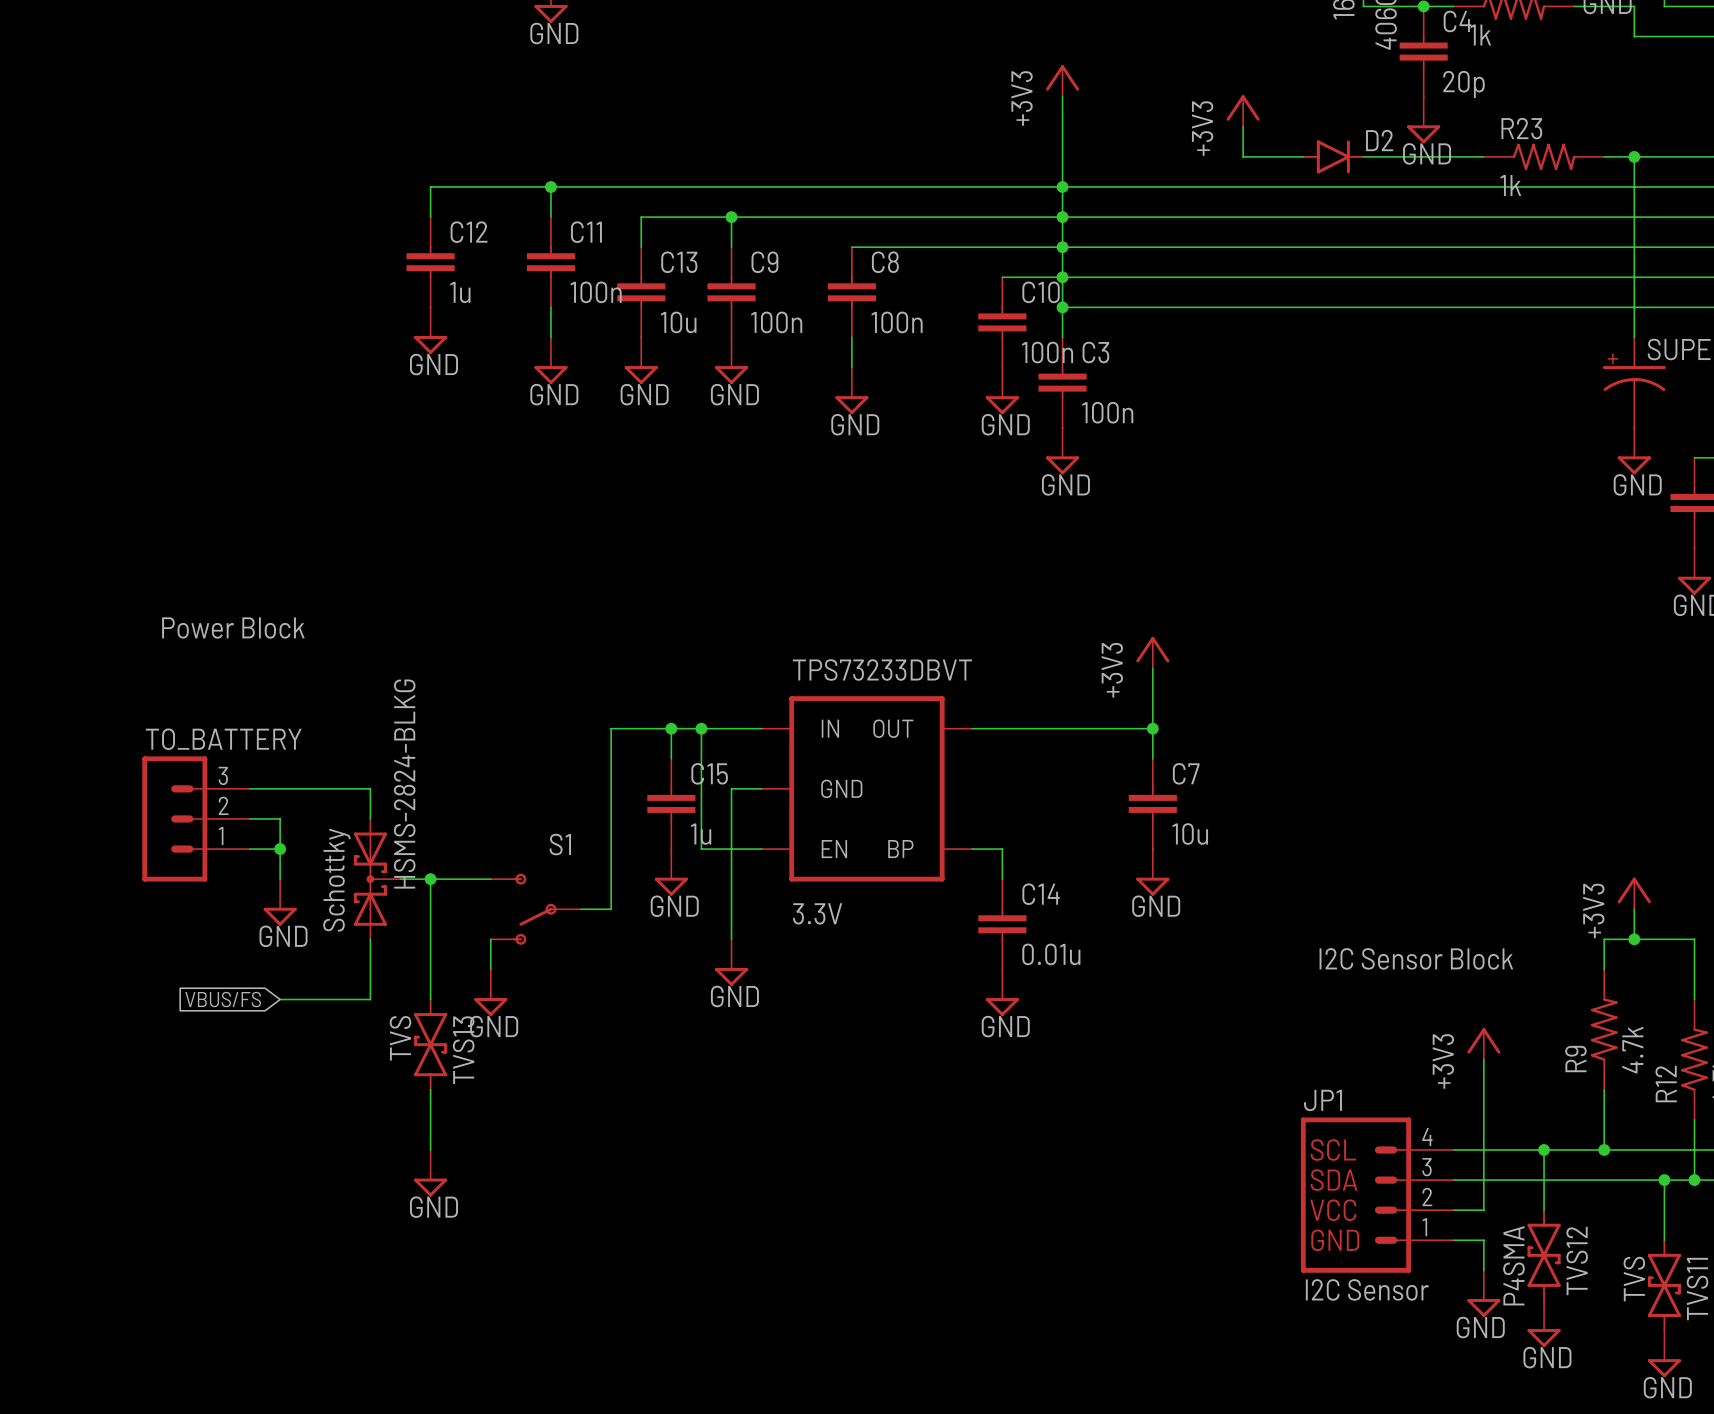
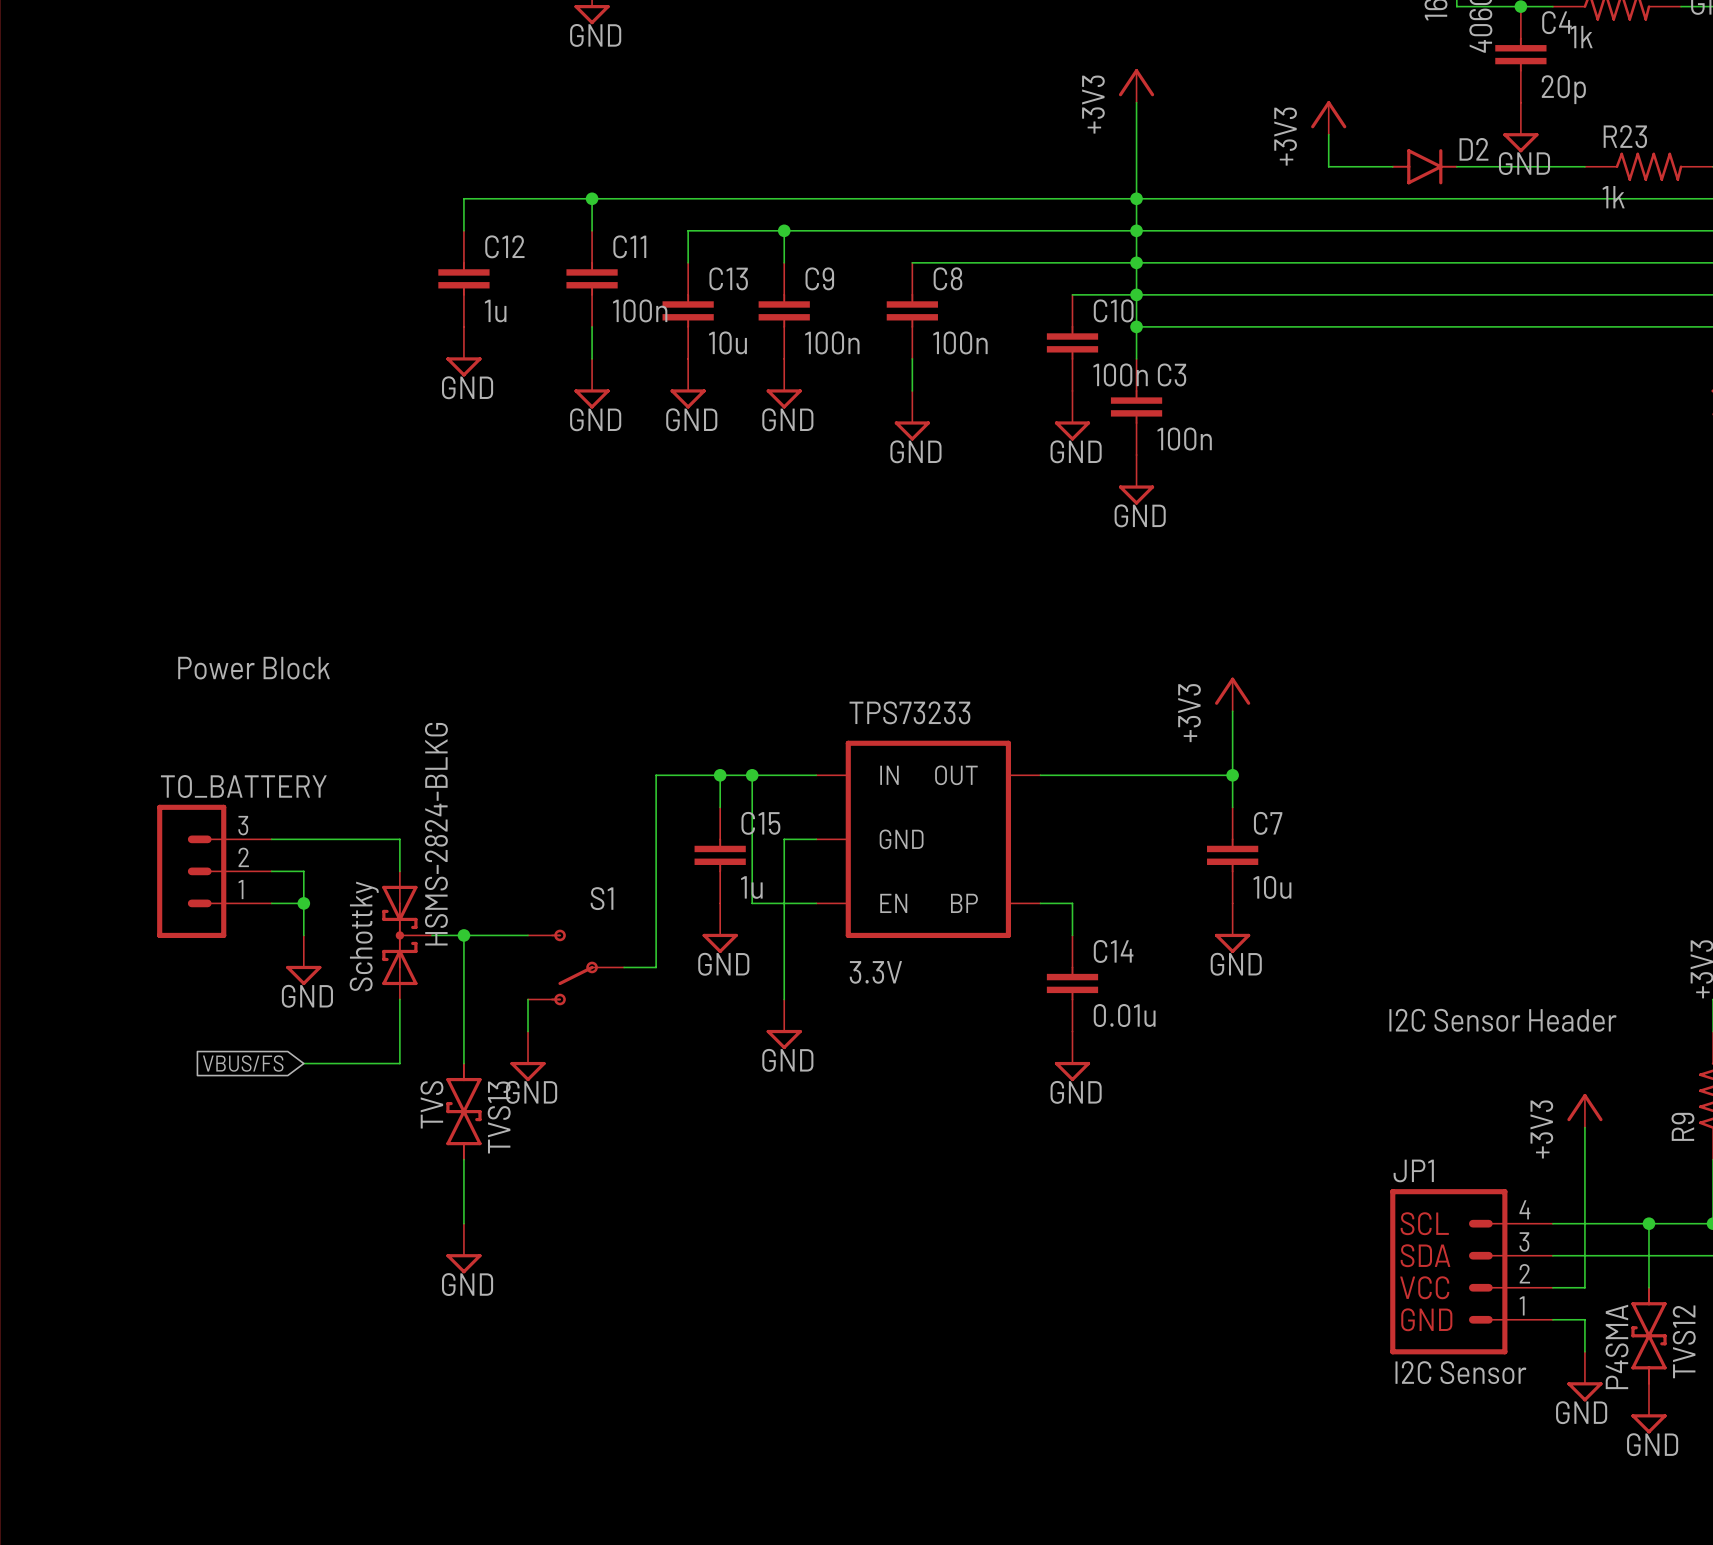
TPS73233DBVT name: TPS73233DBVT (882, 670) -> TPS73233 (909, 712)
text: I2C Sensor Block (1416, 958) -> I2C Sensor Header (1502, 1020)

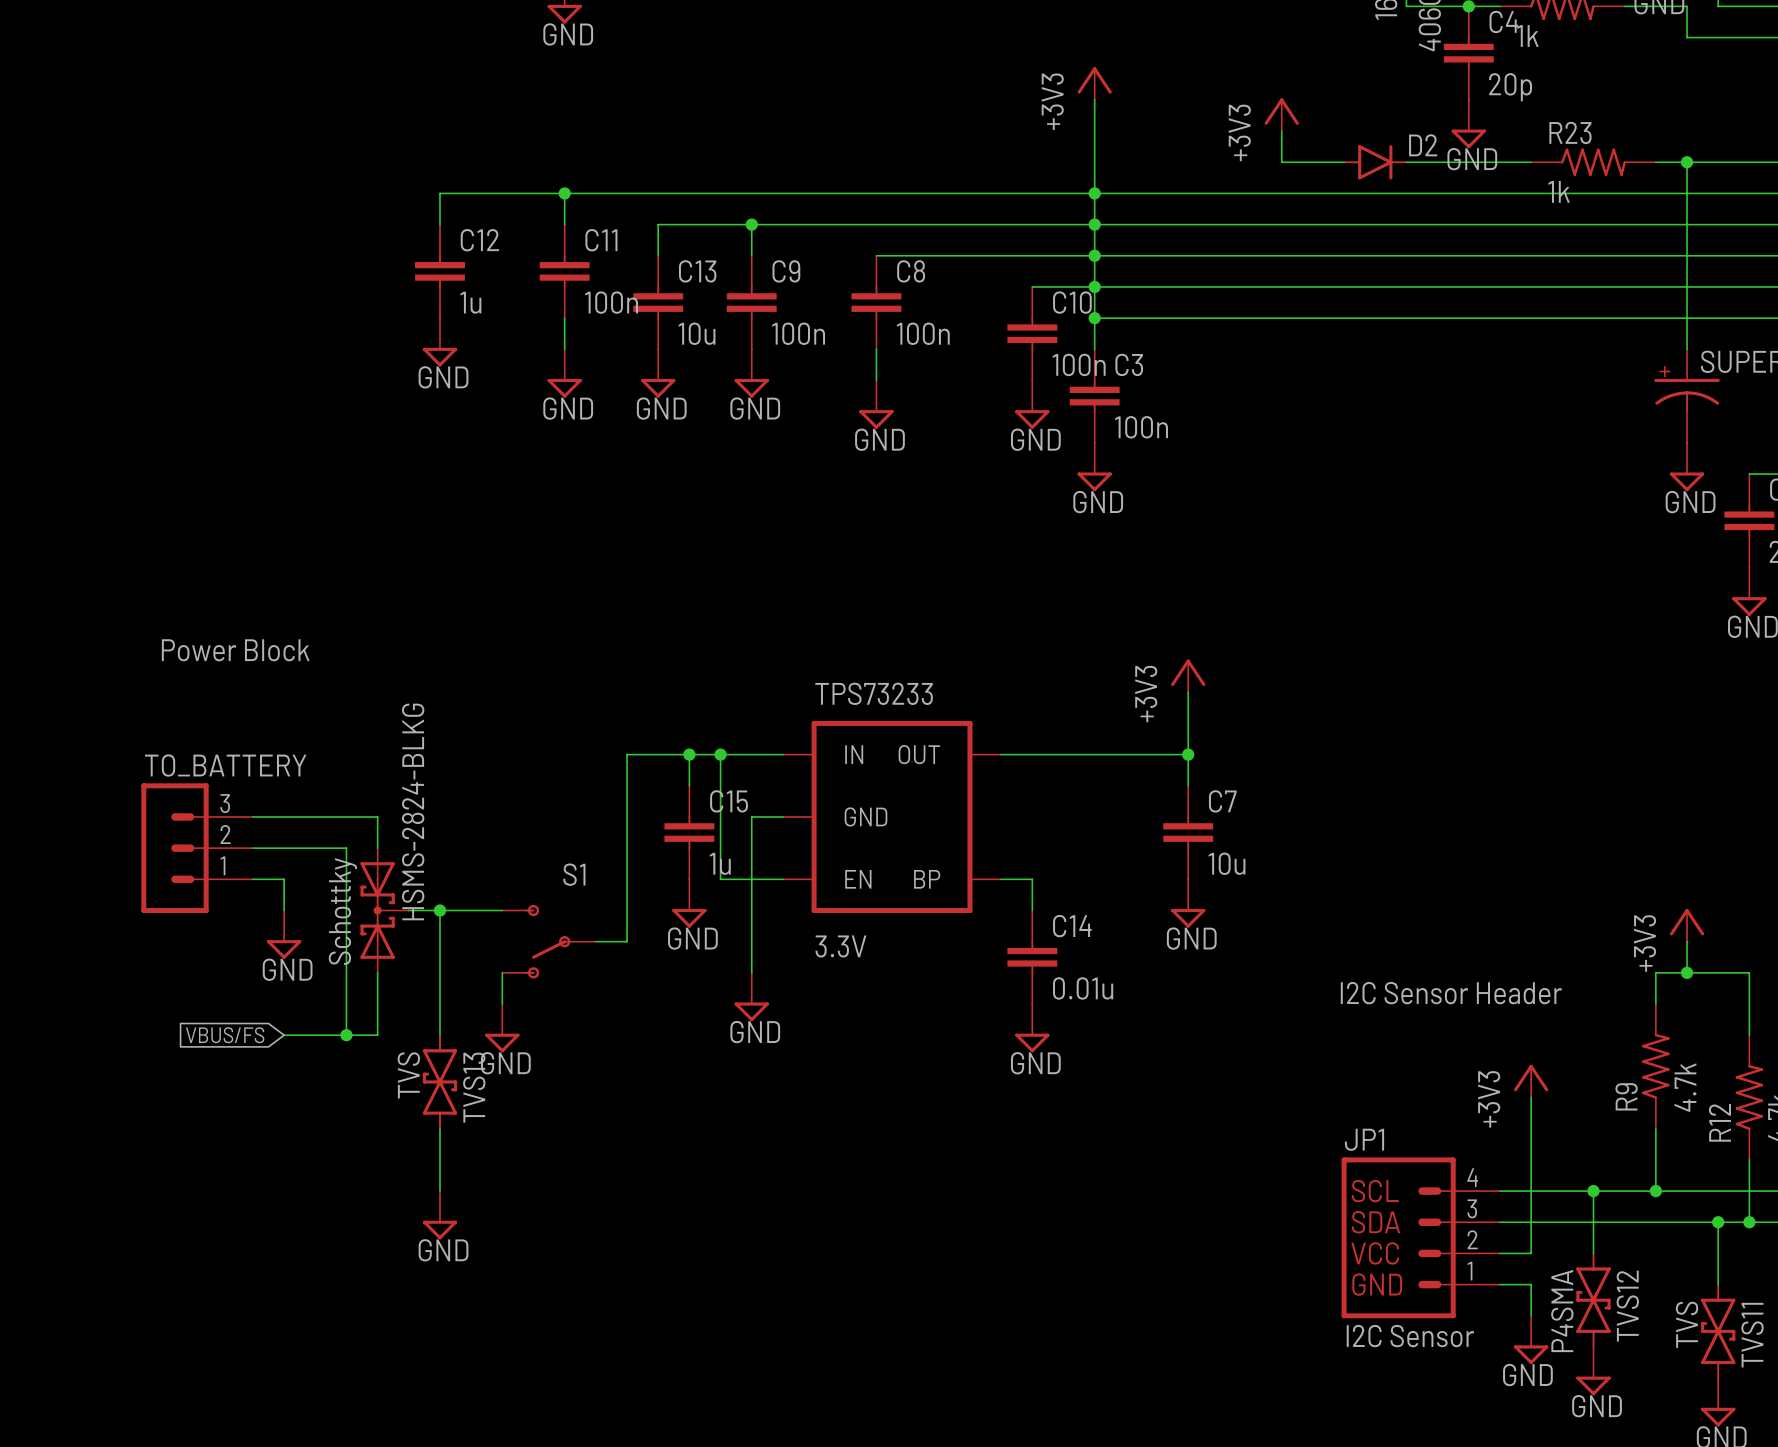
wire: (303, 871) (303, 903) -> (284, 848) (346, 848) (346, 1035)
junction: (303, 903) -> none
junction: none -> (346, 1035)

